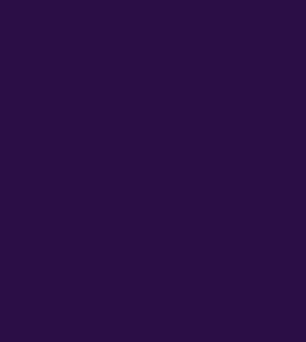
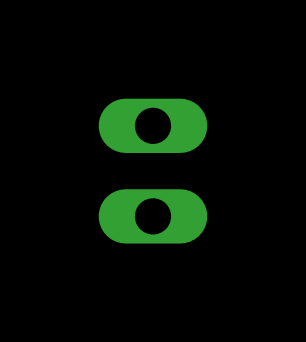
part: none -> (152, 171)

